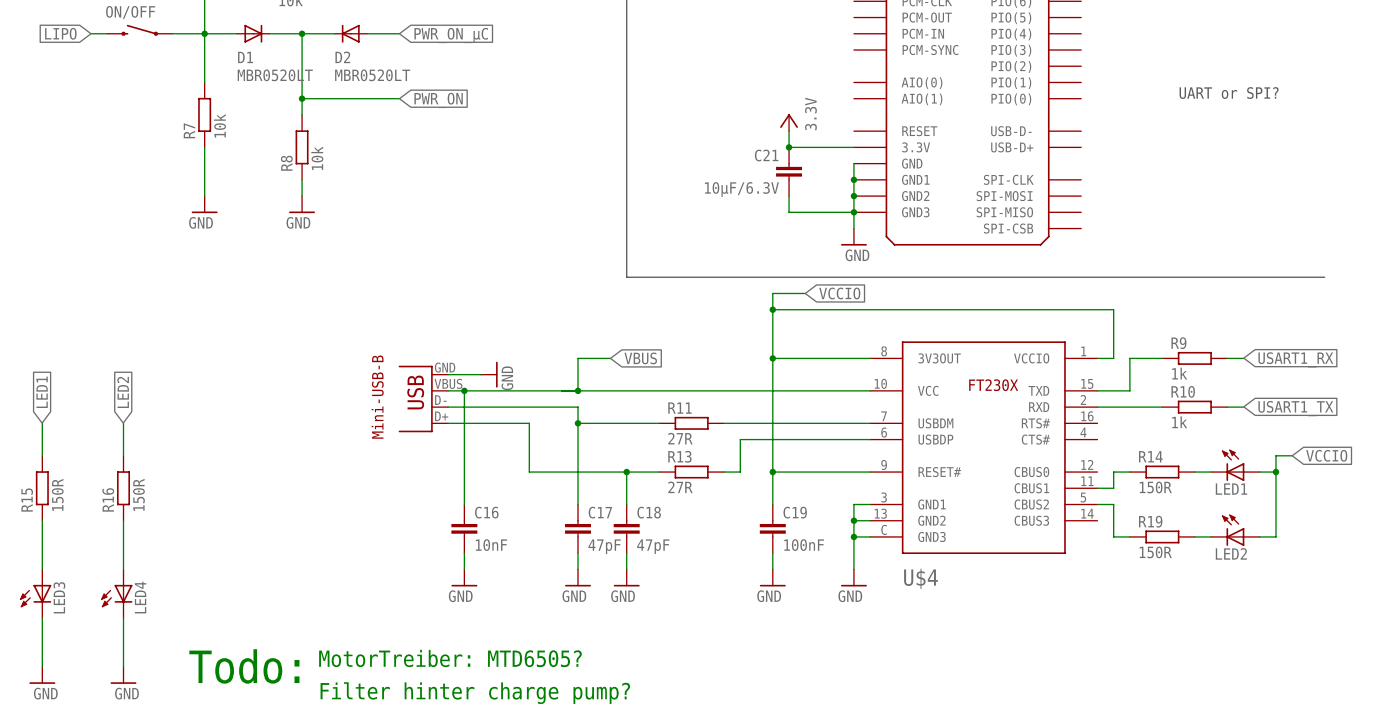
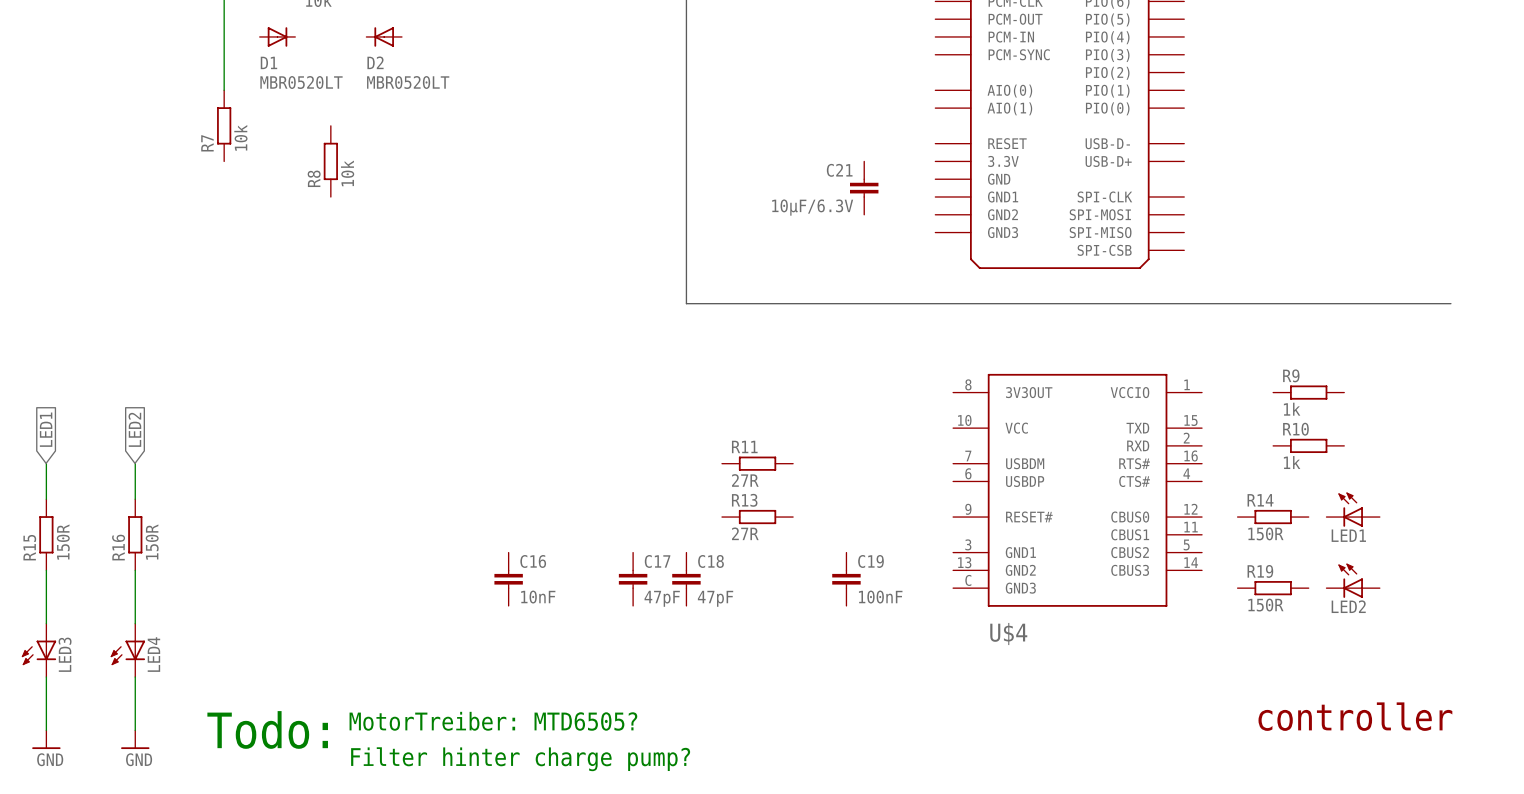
ON/OFF: (139, 30) -> none
global label: LIPO (60, 33) -> none
wire: (91, 33) (107, 33) -> none
wire: (172, 33) (237, 33) -> none
junction: (204, 33) -> none
wire: (269, 33) (334, 33) -> none
wire: (302, 33) (302, 114) -> none
junction: (302, 33) -> none
wire: (366, 33) (399, 33) -> none
global label: PWR_ON_µC (451, 35) -> none
text: UART or SPI? (1229, 93) -> none
wire: (302, 98) (399, 98) -> none
junction: (302, 98) -> none
global label: PWR_ON (438, 100) -> none
power symbol: 3.3V (789, 122) -> none
wire: (789, 131) (789, 147) (853, 147) -> none
wire: (204, 147) (204, 196) -> none
junction: (789, 147) -> none
wire: (853, 163) (853, 228) -> none
wire: (302, 179) (302, 196) -> none
junction: (853, 179) -> none
wire: (789, 196) (789, 212) (853, 212) -> none
junction: (853, 196) -> none
power symbol: GND (204, 204) -> none
power symbol: GND (302, 204) -> none
junction: (853, 212) -> none
power symbol: GND (853, 237) -> none
wire: (805, 293) (772, 293) (772, 504) -> none
global label: VCCIO (839, 293) -> none
wire: (772, 309) (1113, 309) (1113, 358) (1097, 358) -> none
junction: (772, 309) -> none
wire: (610, 358) (578, 358) (578, 390) -> none
global label: VBUS (640, 358) -> none
wire: (772, 358) (870, 358) -> none
junction: (772, 358) -> none
wire: (1162, 358) (1129, 358) (1129, 390) (1097, 390) -> none
wire: (1227, 358) (1243, 358) -> none
global label: USART1_RX (1295, 359) -> none
wire: (448, 374) (480, 374) -> none
power symbol: GND (489, 374) -> none
text: FT230X (993, 385) -> none
wire: (448, 390) (870, 390) -> none
wire: (464, 390) (464, 504) -> none
junction: (464, 390) -> none
junction: (578, 390) -> none
text: Mini-USB-B (377, 397) -> none
part: (423, 398) -> none
wire: (448, 407) (578, 407) (578, 504) -> none
wire: (1097, 407) (1162, 407) -> none
wire: (1227, 407) (1243, 407) -> none
global label: USART1_TX (1295, 408) -> none
wire: (448, 423) (529, 423) (529, 472) (659, 472) -> none
wire: (578, 423) (659, 423) -> none
junction: (578, 423) -> none
wire: (724, 423) (870, 423) -> none
wire: (870, 439) (740, 439) (740, 472) (724, 472) -> none
wire: (1292, 455) (1275, 455) (1275, 536) (1259, 536) -> none
global label: VCCIO (1326, 455) -> none
wire: (626, 472) (626, 504) -> none
junction: (626, 472) -> none
wire: (772, 472) (870, 472) -> none
junction: (772, 472) -> none
wire: (1129, 472) (1113, 472) (1113, 488) (1097, 488) -> none
wire: (1194, 472) (1211, 472) -> none
wire: (1259, 472) (1275, 472) -> none
junction: (1275, 472) -> none
wire: (870, 504) (853, 504) (853, 569) -> none
wire: (1097, 504) (1113, 504) (1113, 536) (1129, 536) -> none
wire: (853, 520) (870, 520) -> none
junction: (853, 520) -> none
wire: (853, 536) (870, 536) -> none
junction: (853, 536) -> none
wire: (1194, 536) (1211, 536) -> none
wire: (464, 553) (464, 569) -> none
wire: (578, 553) (578, 569) -> none
wire: (626, 553) (626, 569) -> none
wire: (772, 553) (772, 569) -> none
power symbol: GND (464, 577) -> none
power symbol: GND (578, 577) -> none
power symbol: GND (626, 577) -> none
power symbol: GND (772, 577) -> none
power symbol: GND (853, 577) -> none
text: none -> controller (1355, 716)

